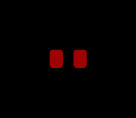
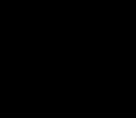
part: (68, 58) -> none

